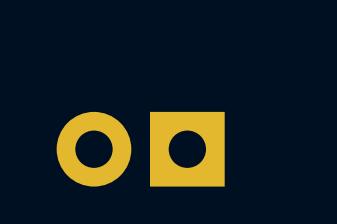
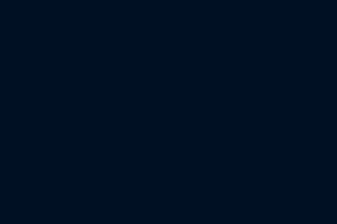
part: (140, 149) -> none

